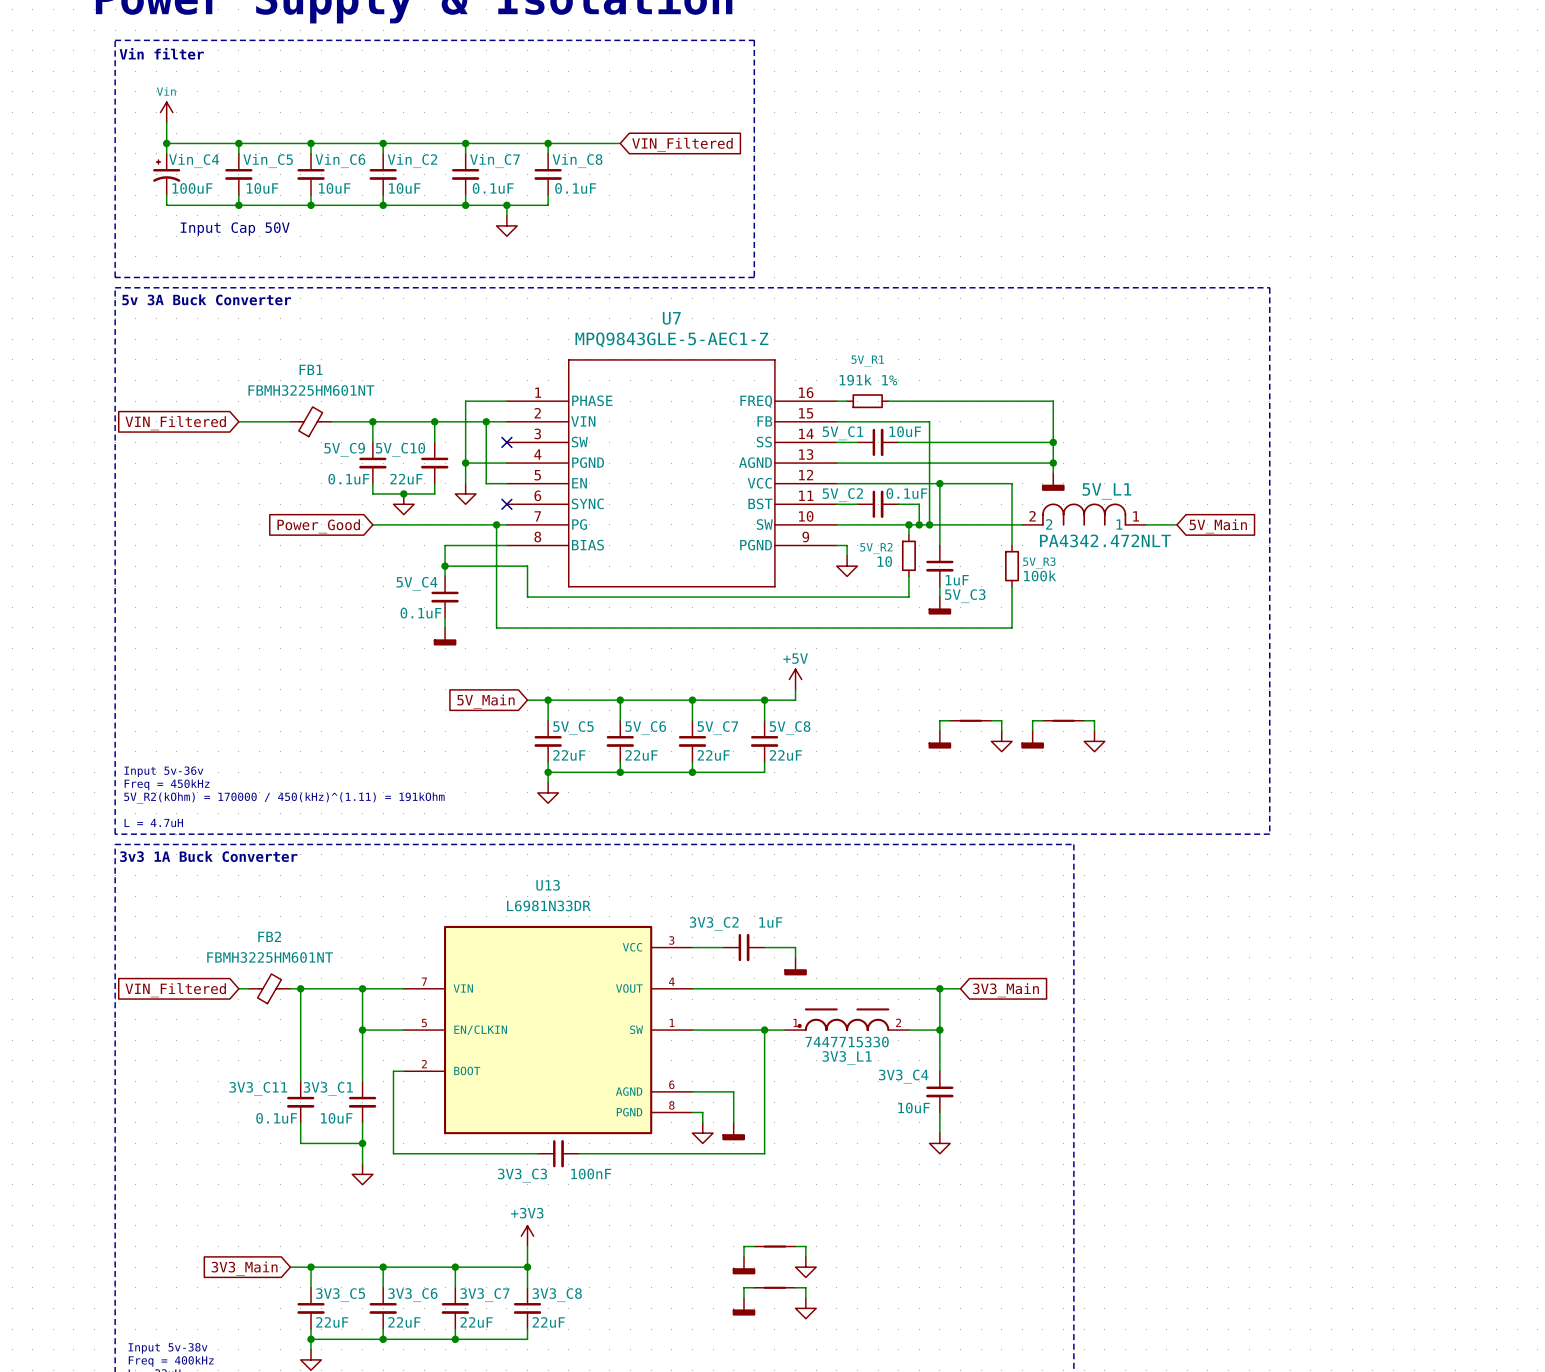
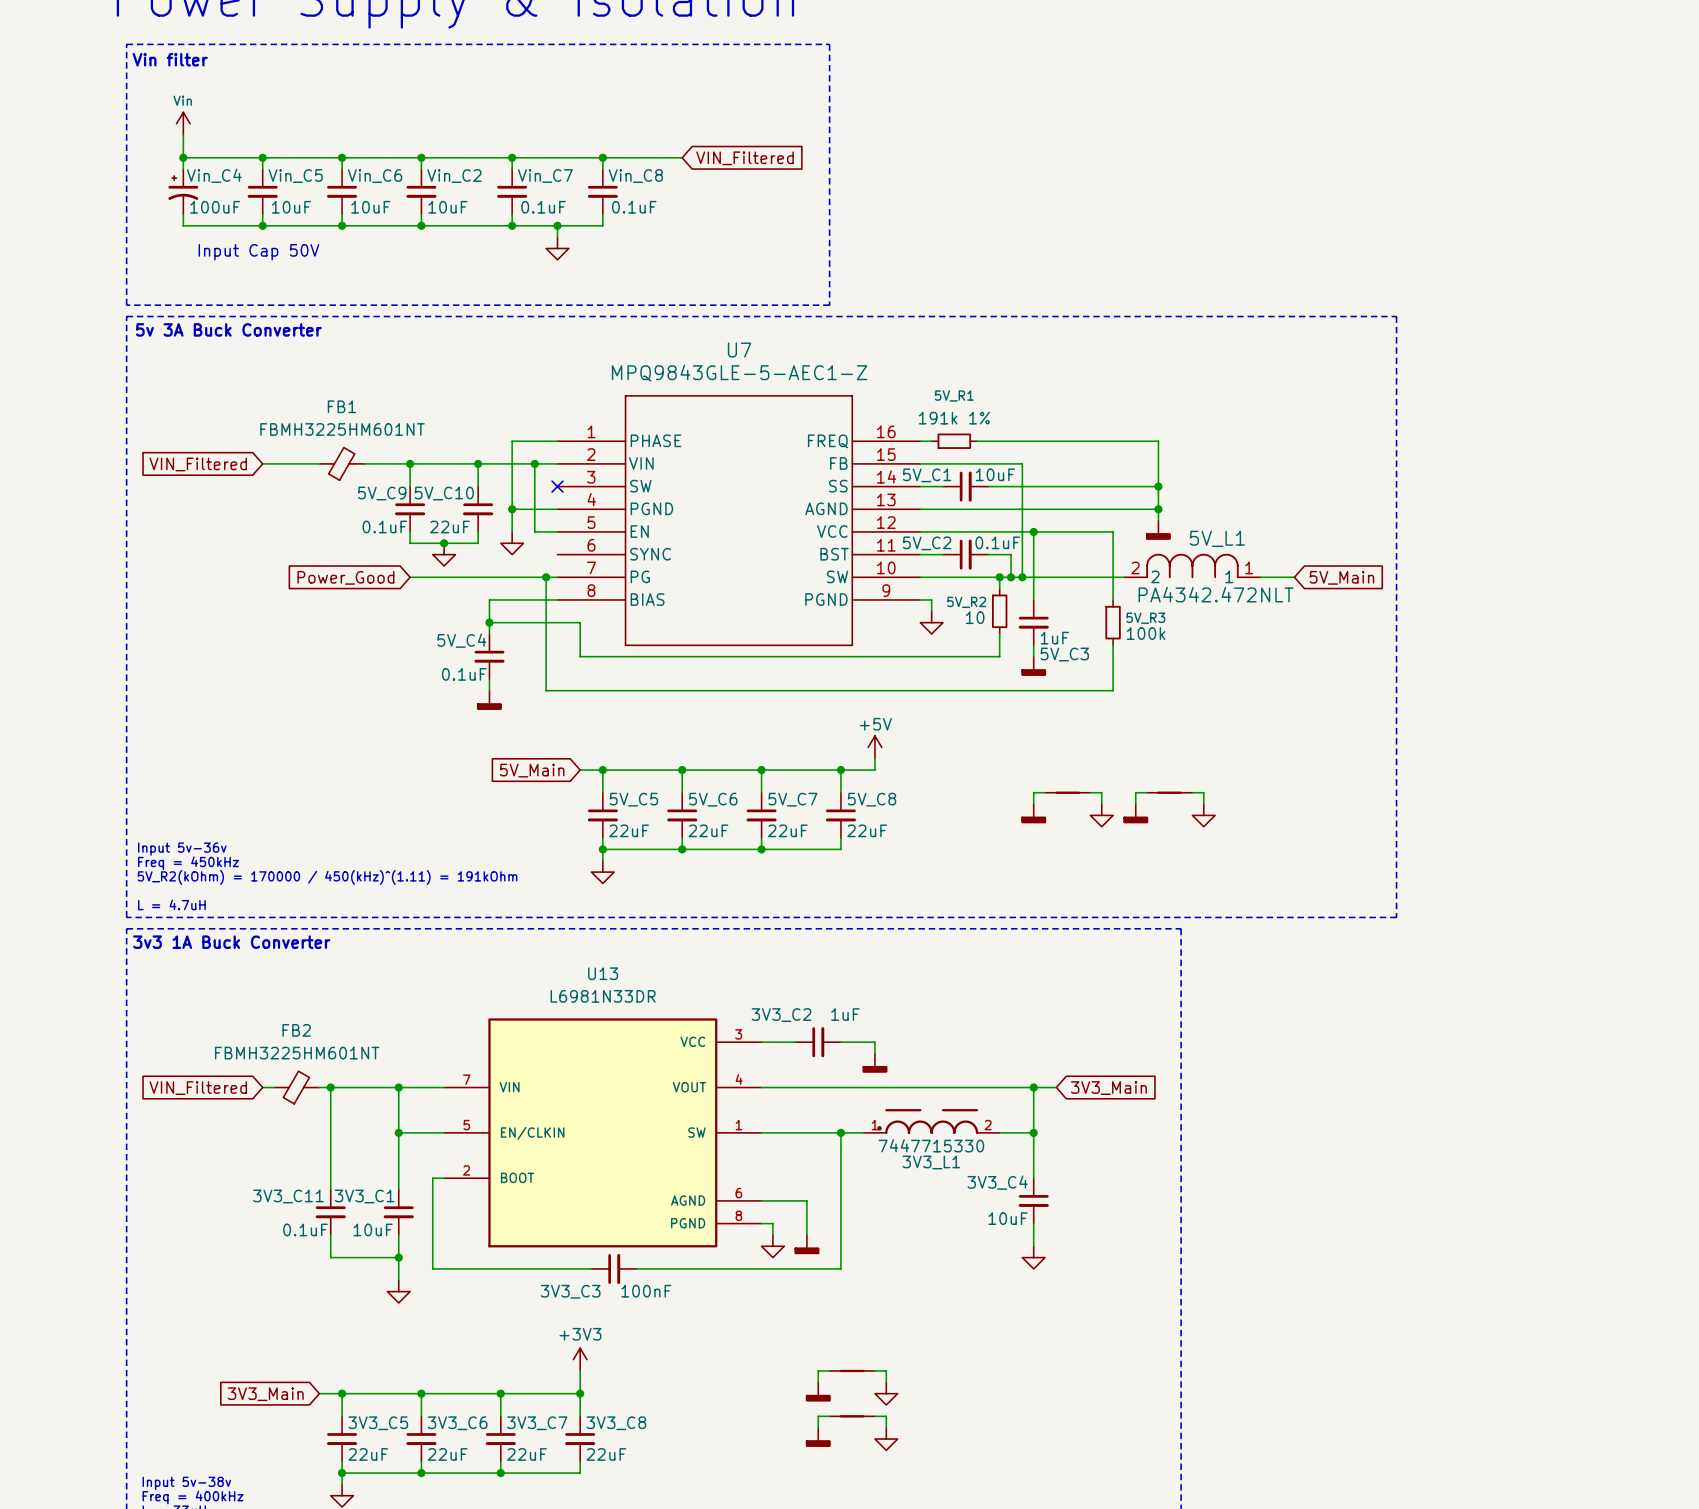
no-connect mark: (506, 504) -> none

